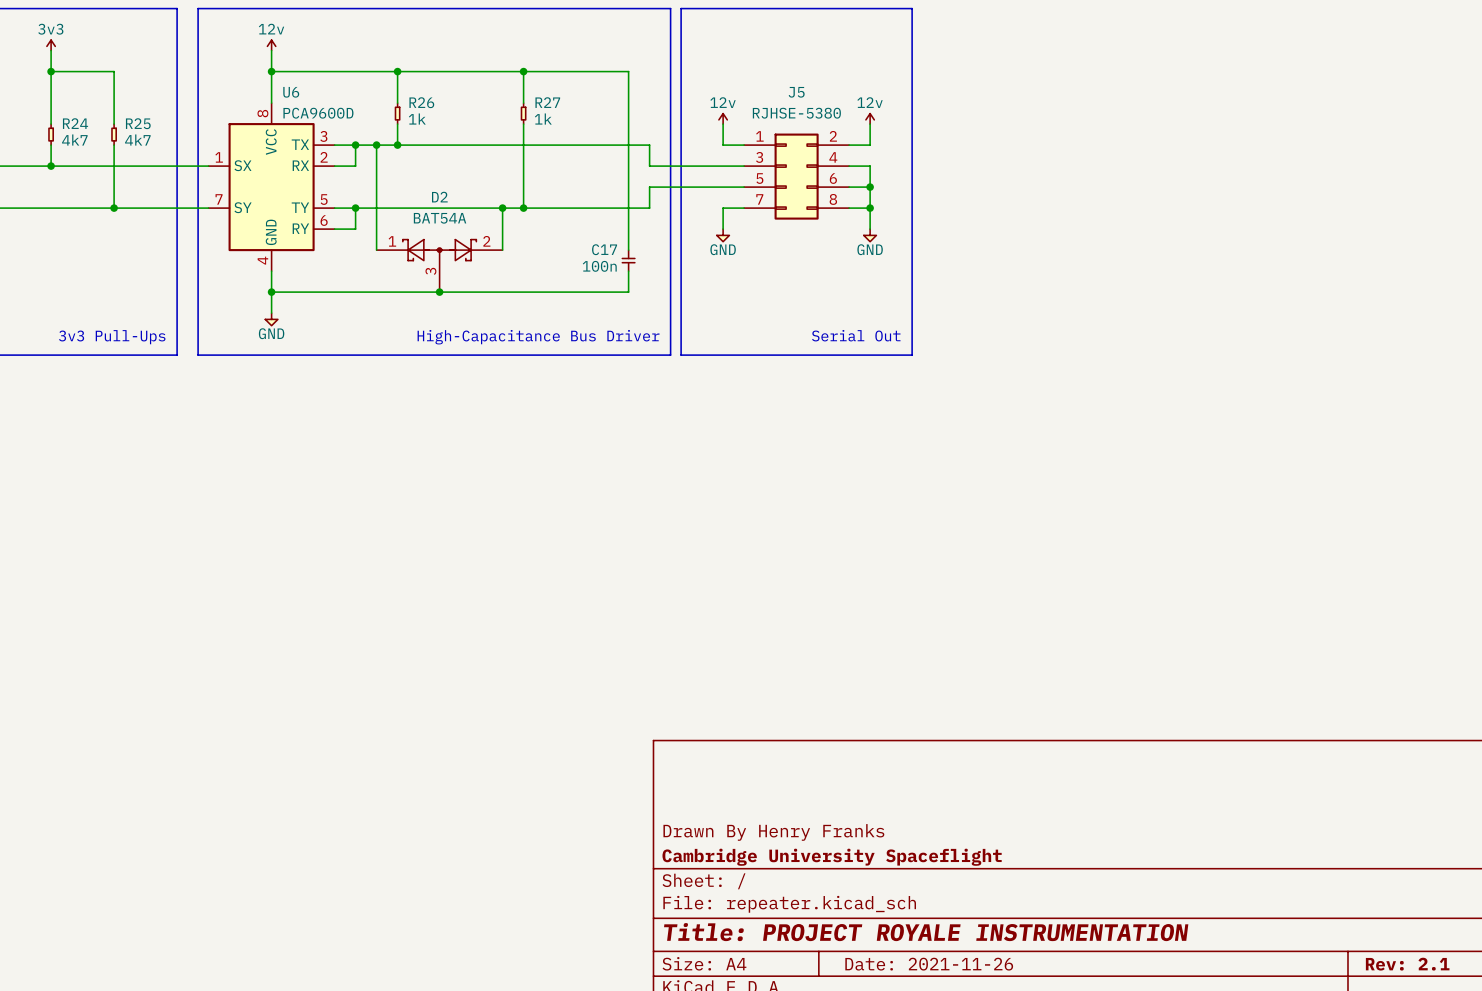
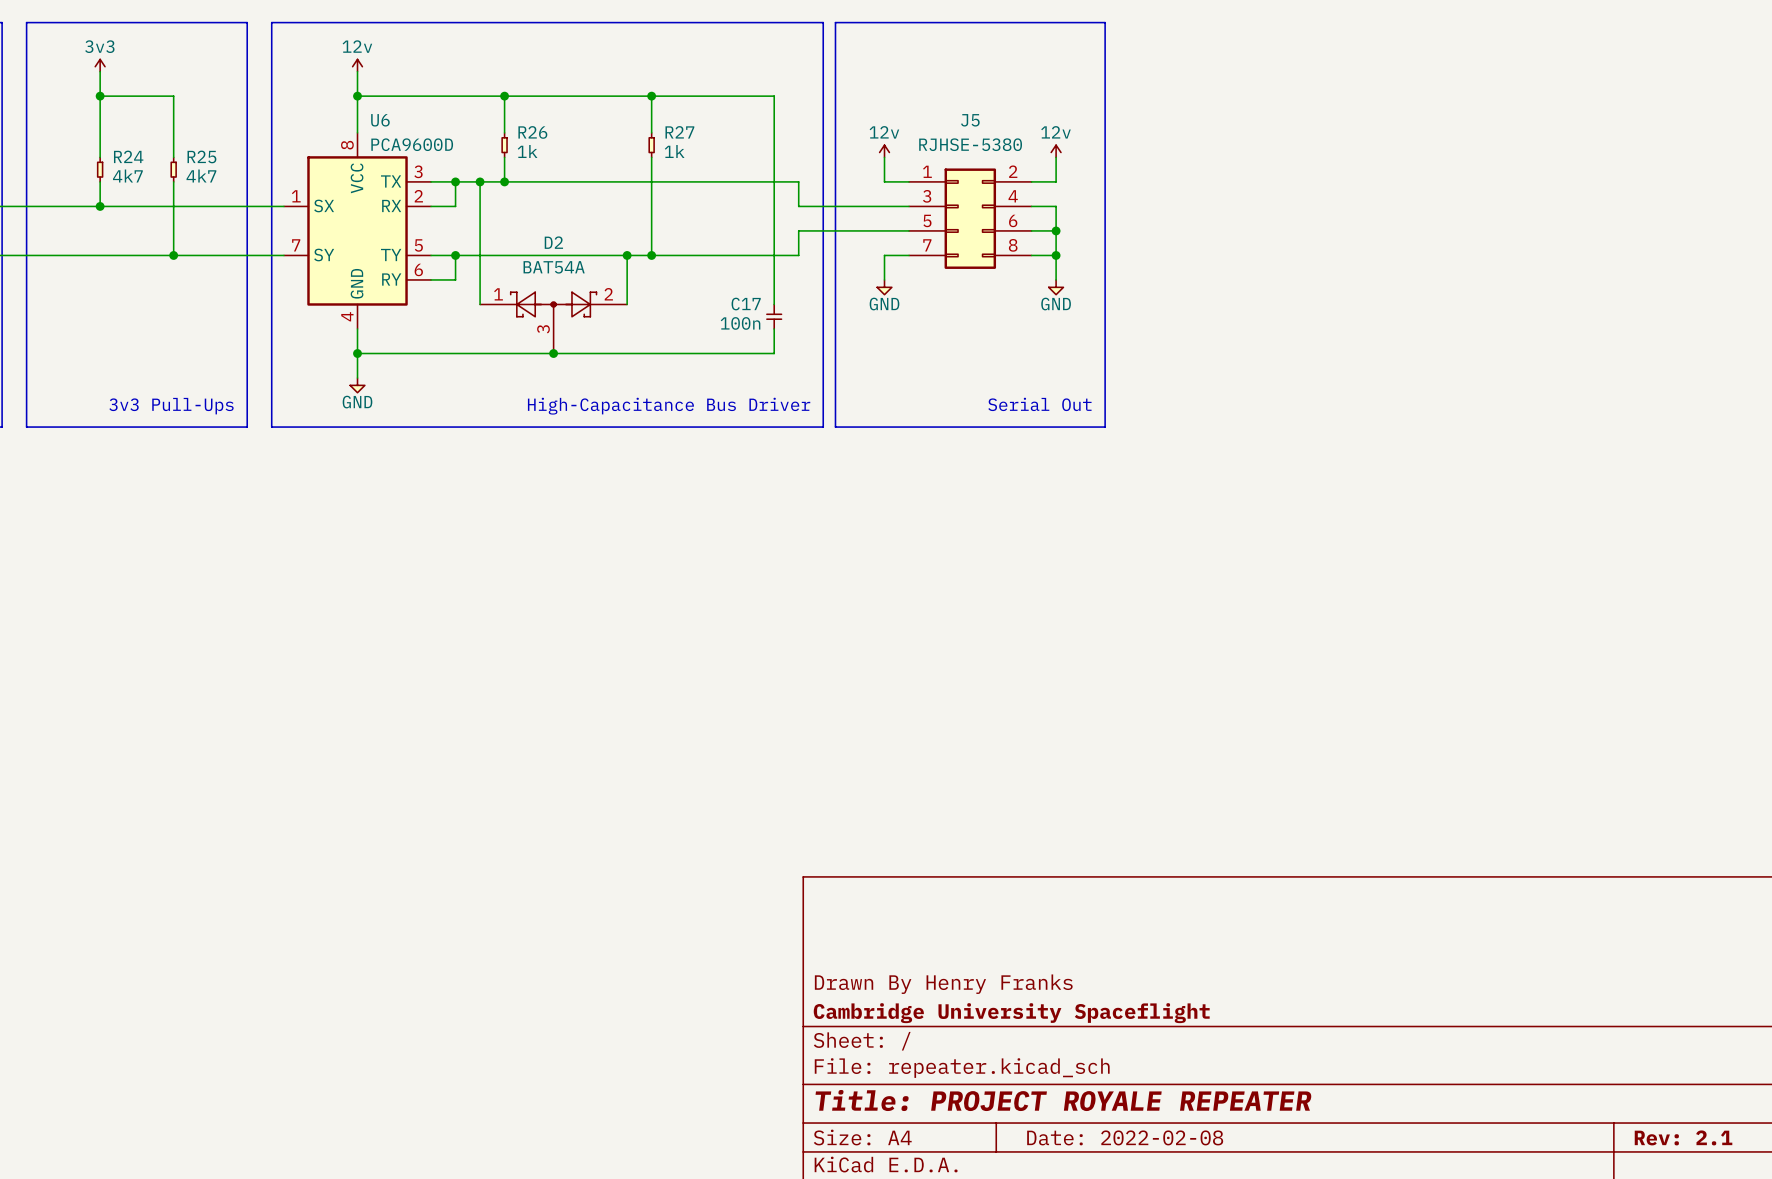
title block: Title: PROJECT ROYALE INSTRUMENTATION (926, 932) -> Title: PROJECT ROYALE REPEATER (1063, 1100)
title block: Date: 2021-11-26 (929, 964) -> Date: 2022-02-08 (1125, 1137)

